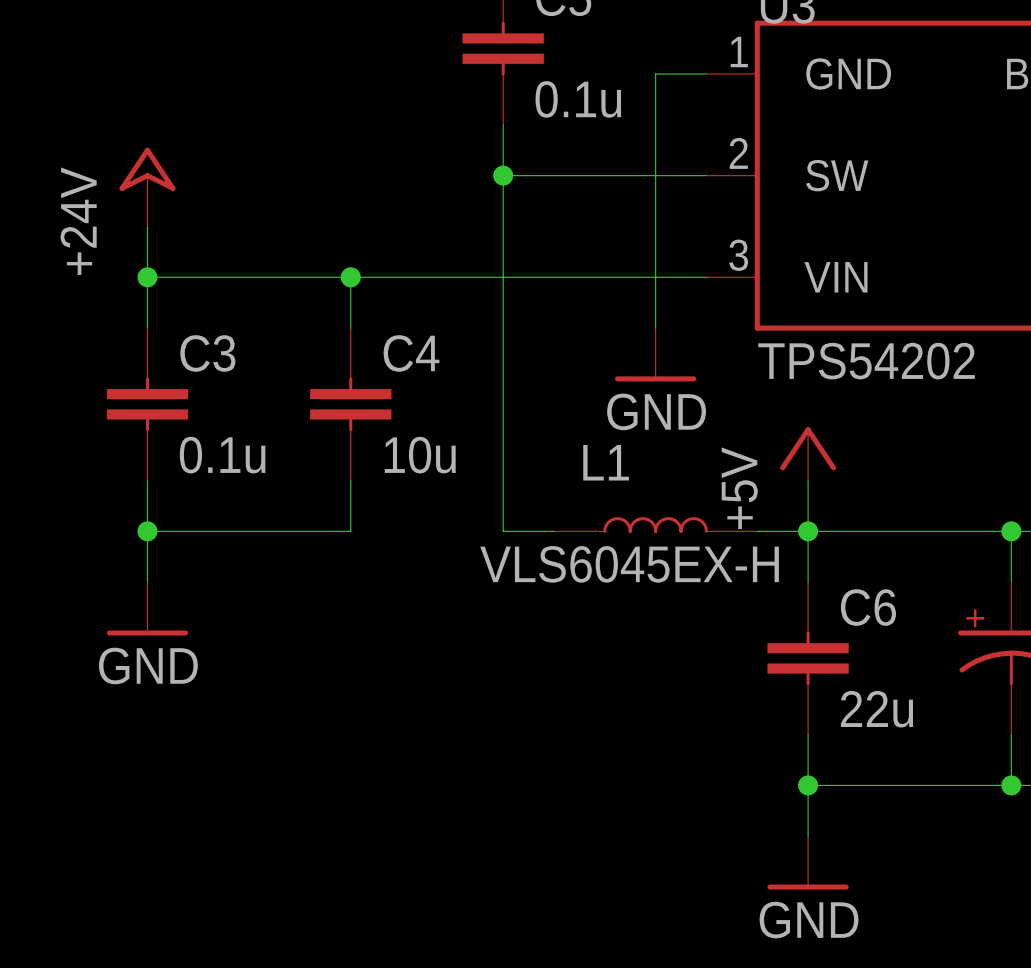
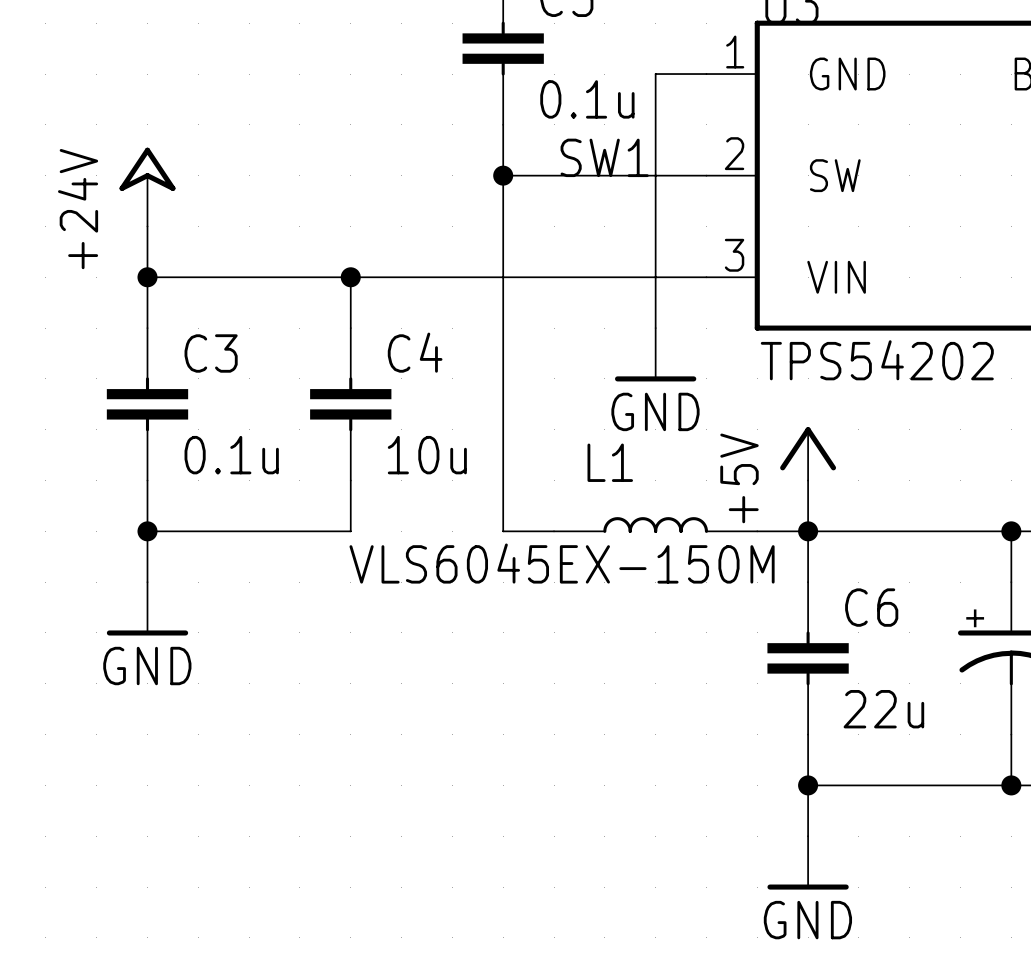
label: none -> SW1 (604, 157)
L1 value: VLS6045EX-H (629, 564) -> VLS6045EX-150M (562, 563)

